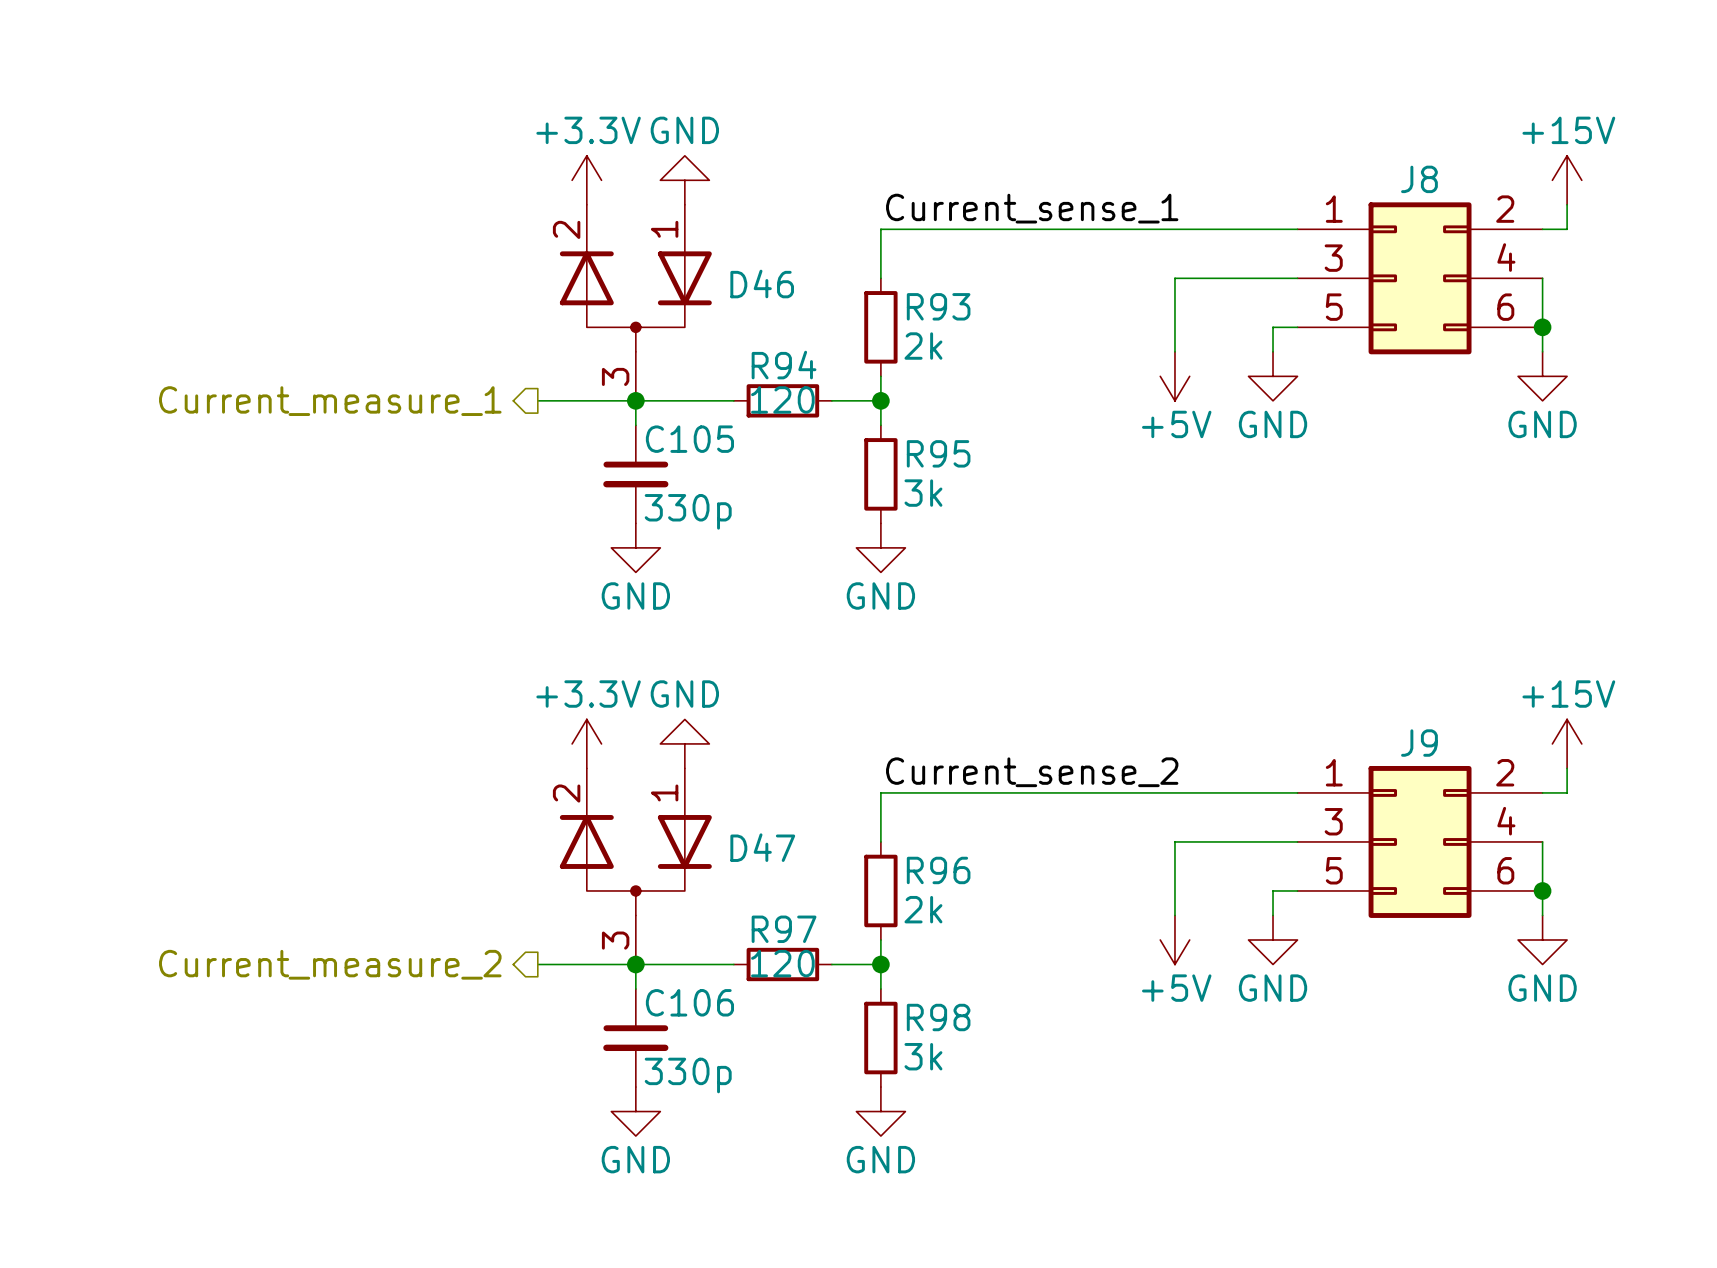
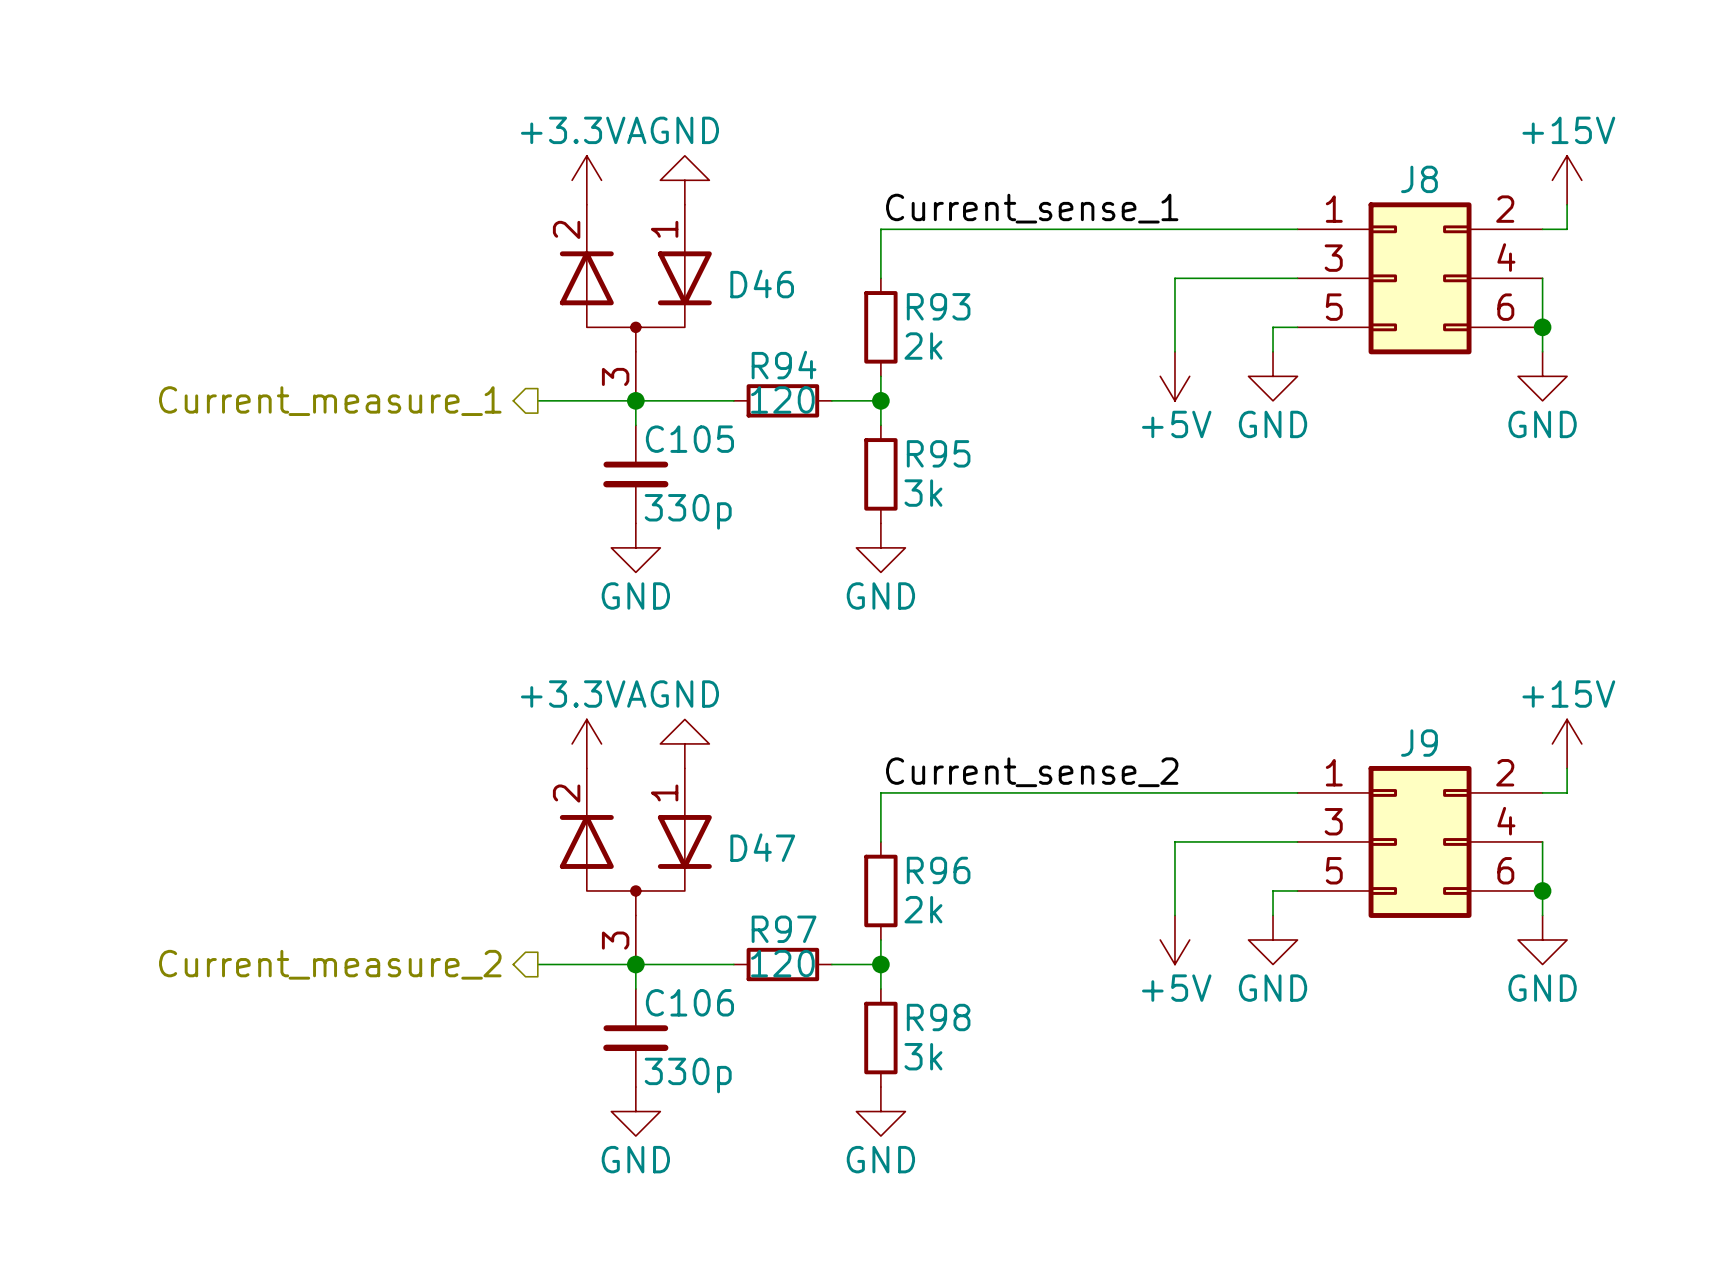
power symbol: +3.3V (586, 180) -> +3.3VA (586, 180)
power symbol: +3.3V (586, 743) -> +3.3VA (586, 743)

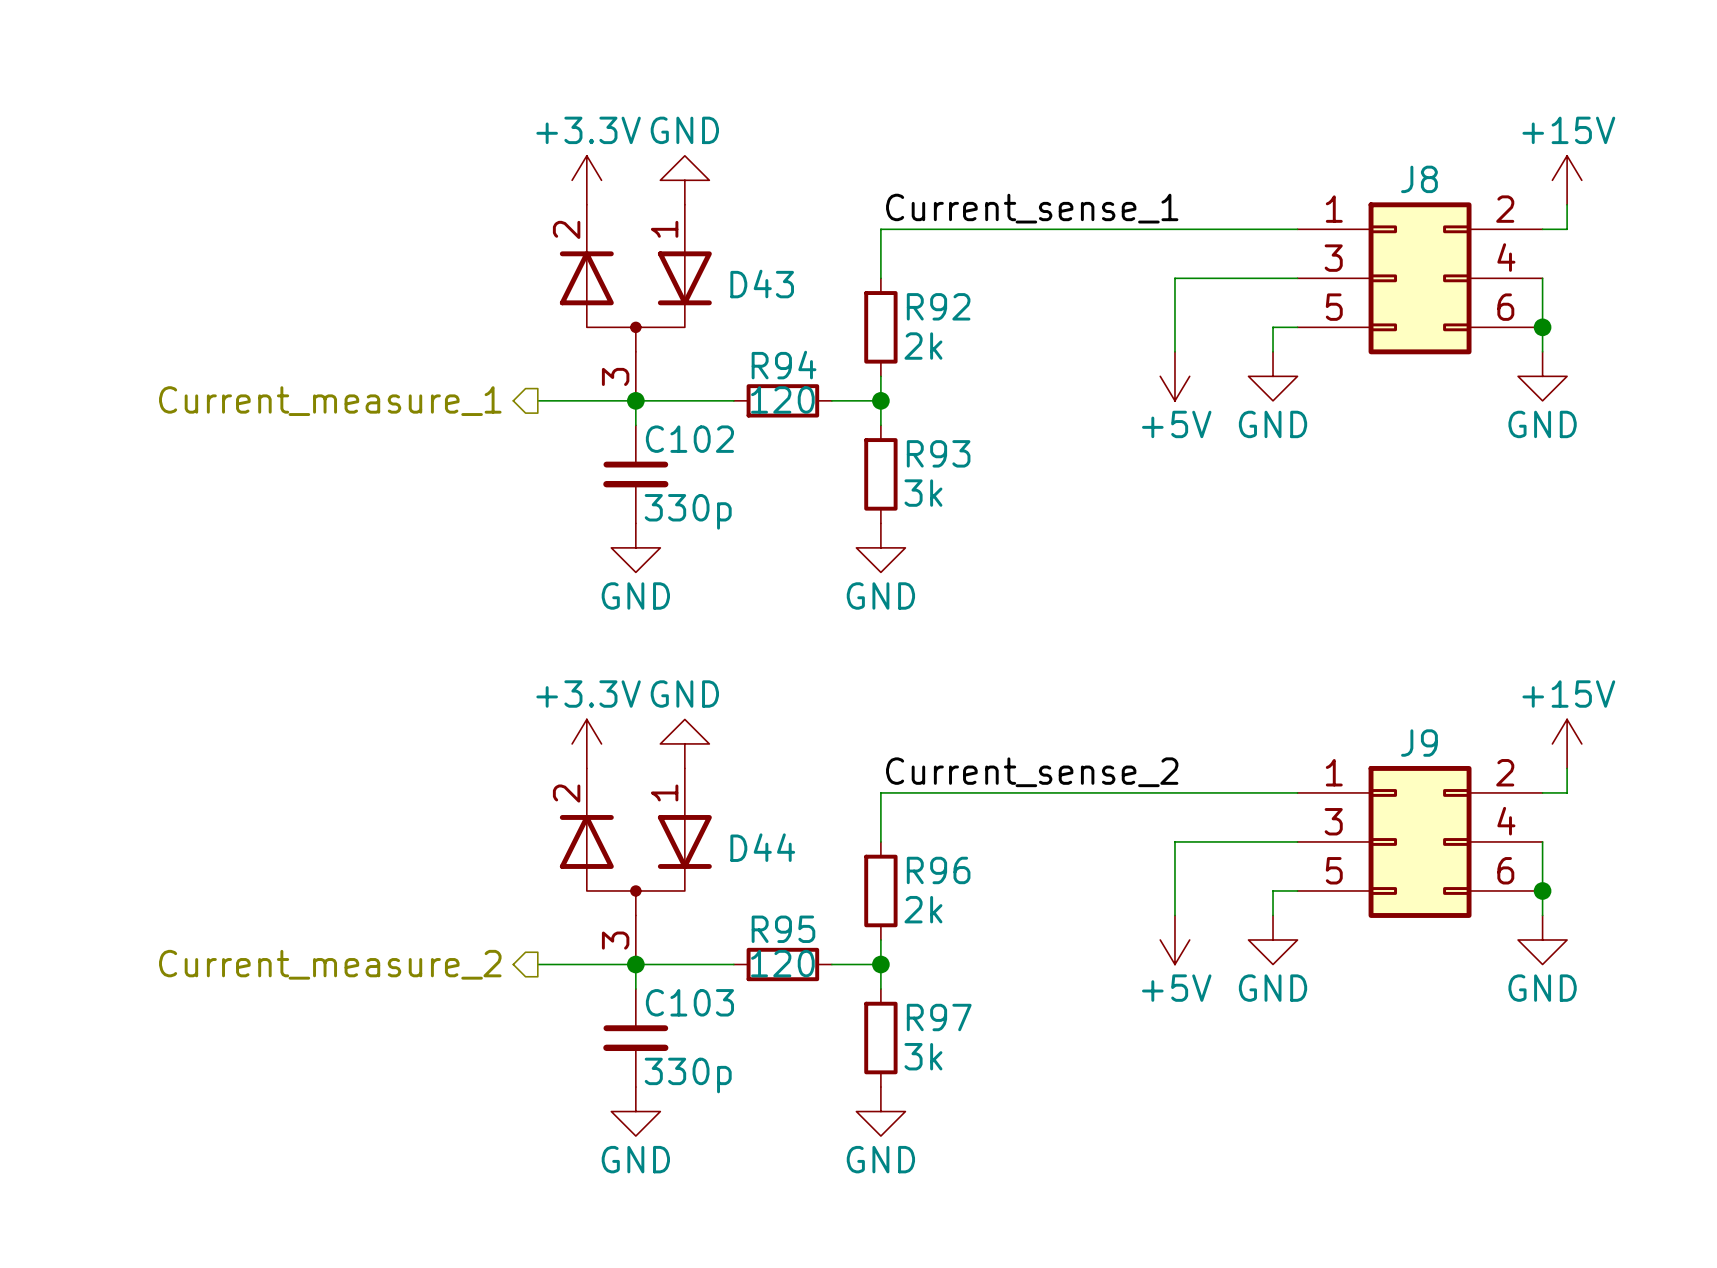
power symbol: +3.3VA (586, 180) -> +3.3V (586, 180)
D46 name: D46 (762, 284) -> D43 (762, 284)
R93 name: R93 (938, 306) -> R92 (938, 306)
C105 name: C105 (689, 439) -> C102 (689, 439)
R95 name: R95 (938, 453) -> R93 (938, 453)
power symbol: +3.3VA (586, 743) -> +3.3V (586, 743)
D47 name: D47 (762, 847) -> D44 (762, 847)
R97 name: R97 (784, 929) -> R95 (783, 929)
C106 name: C106 (689, 1002) -> C103 (689, 1002)
R98 name: R98 (938, 1017) -> R97 (939, 1017)

